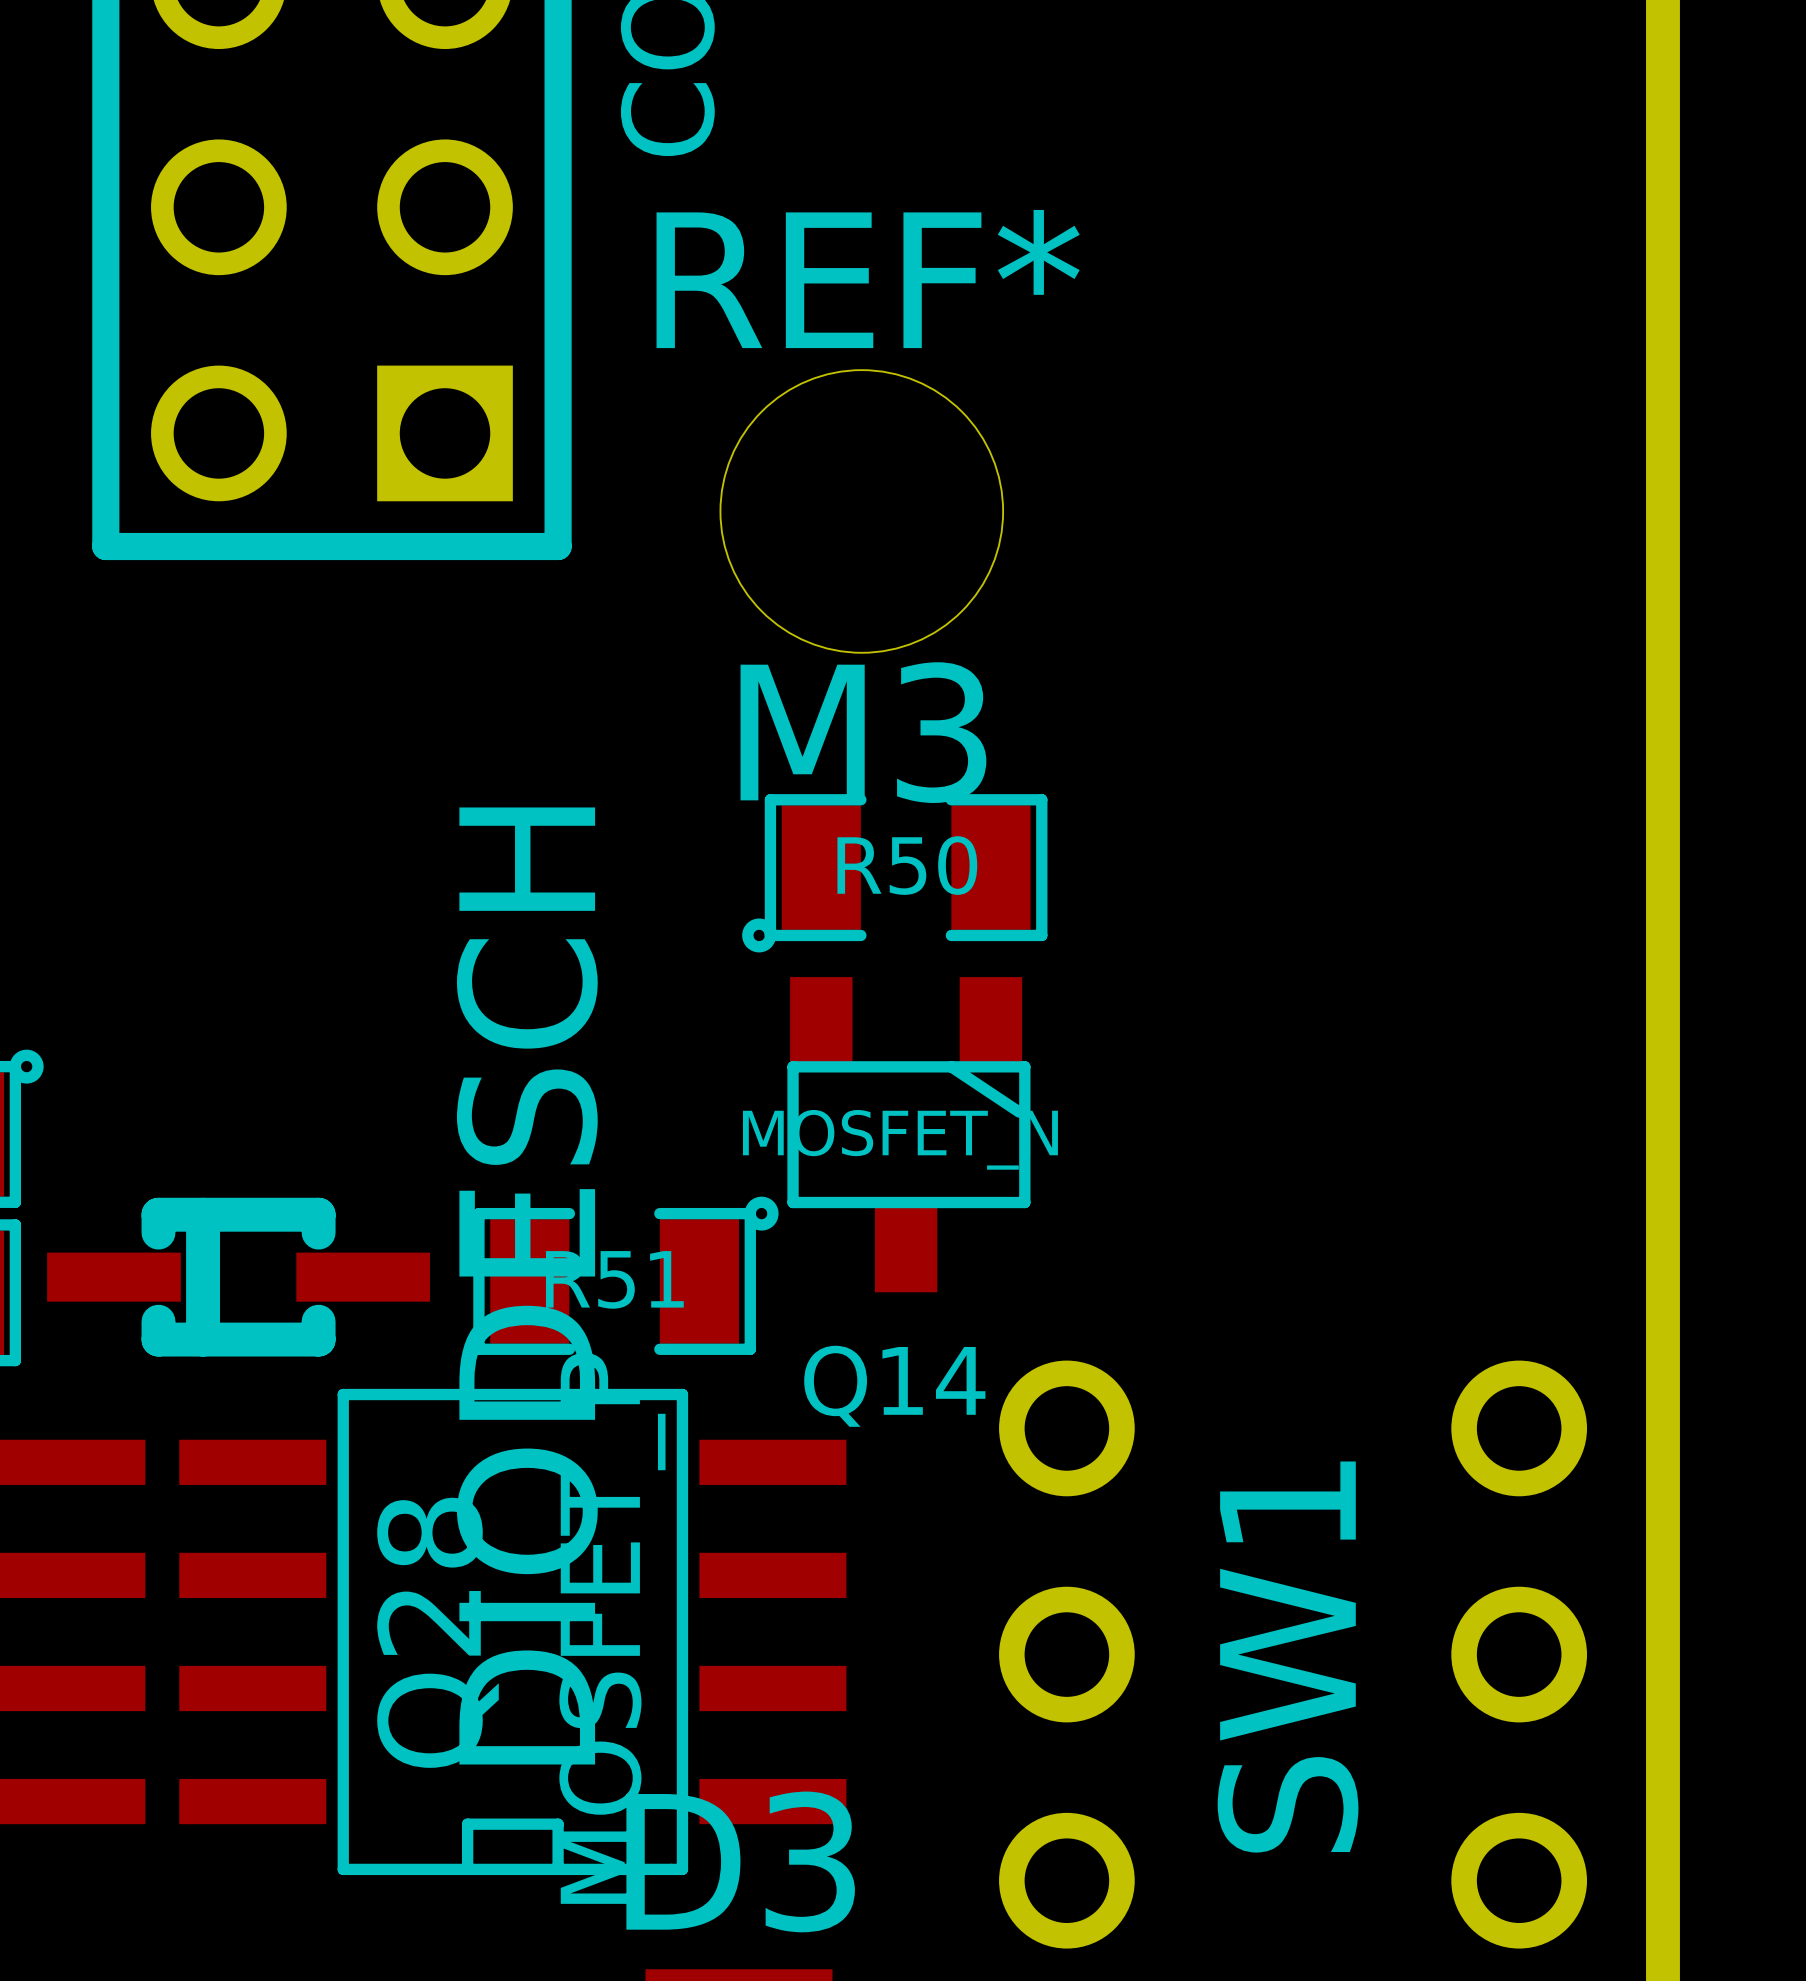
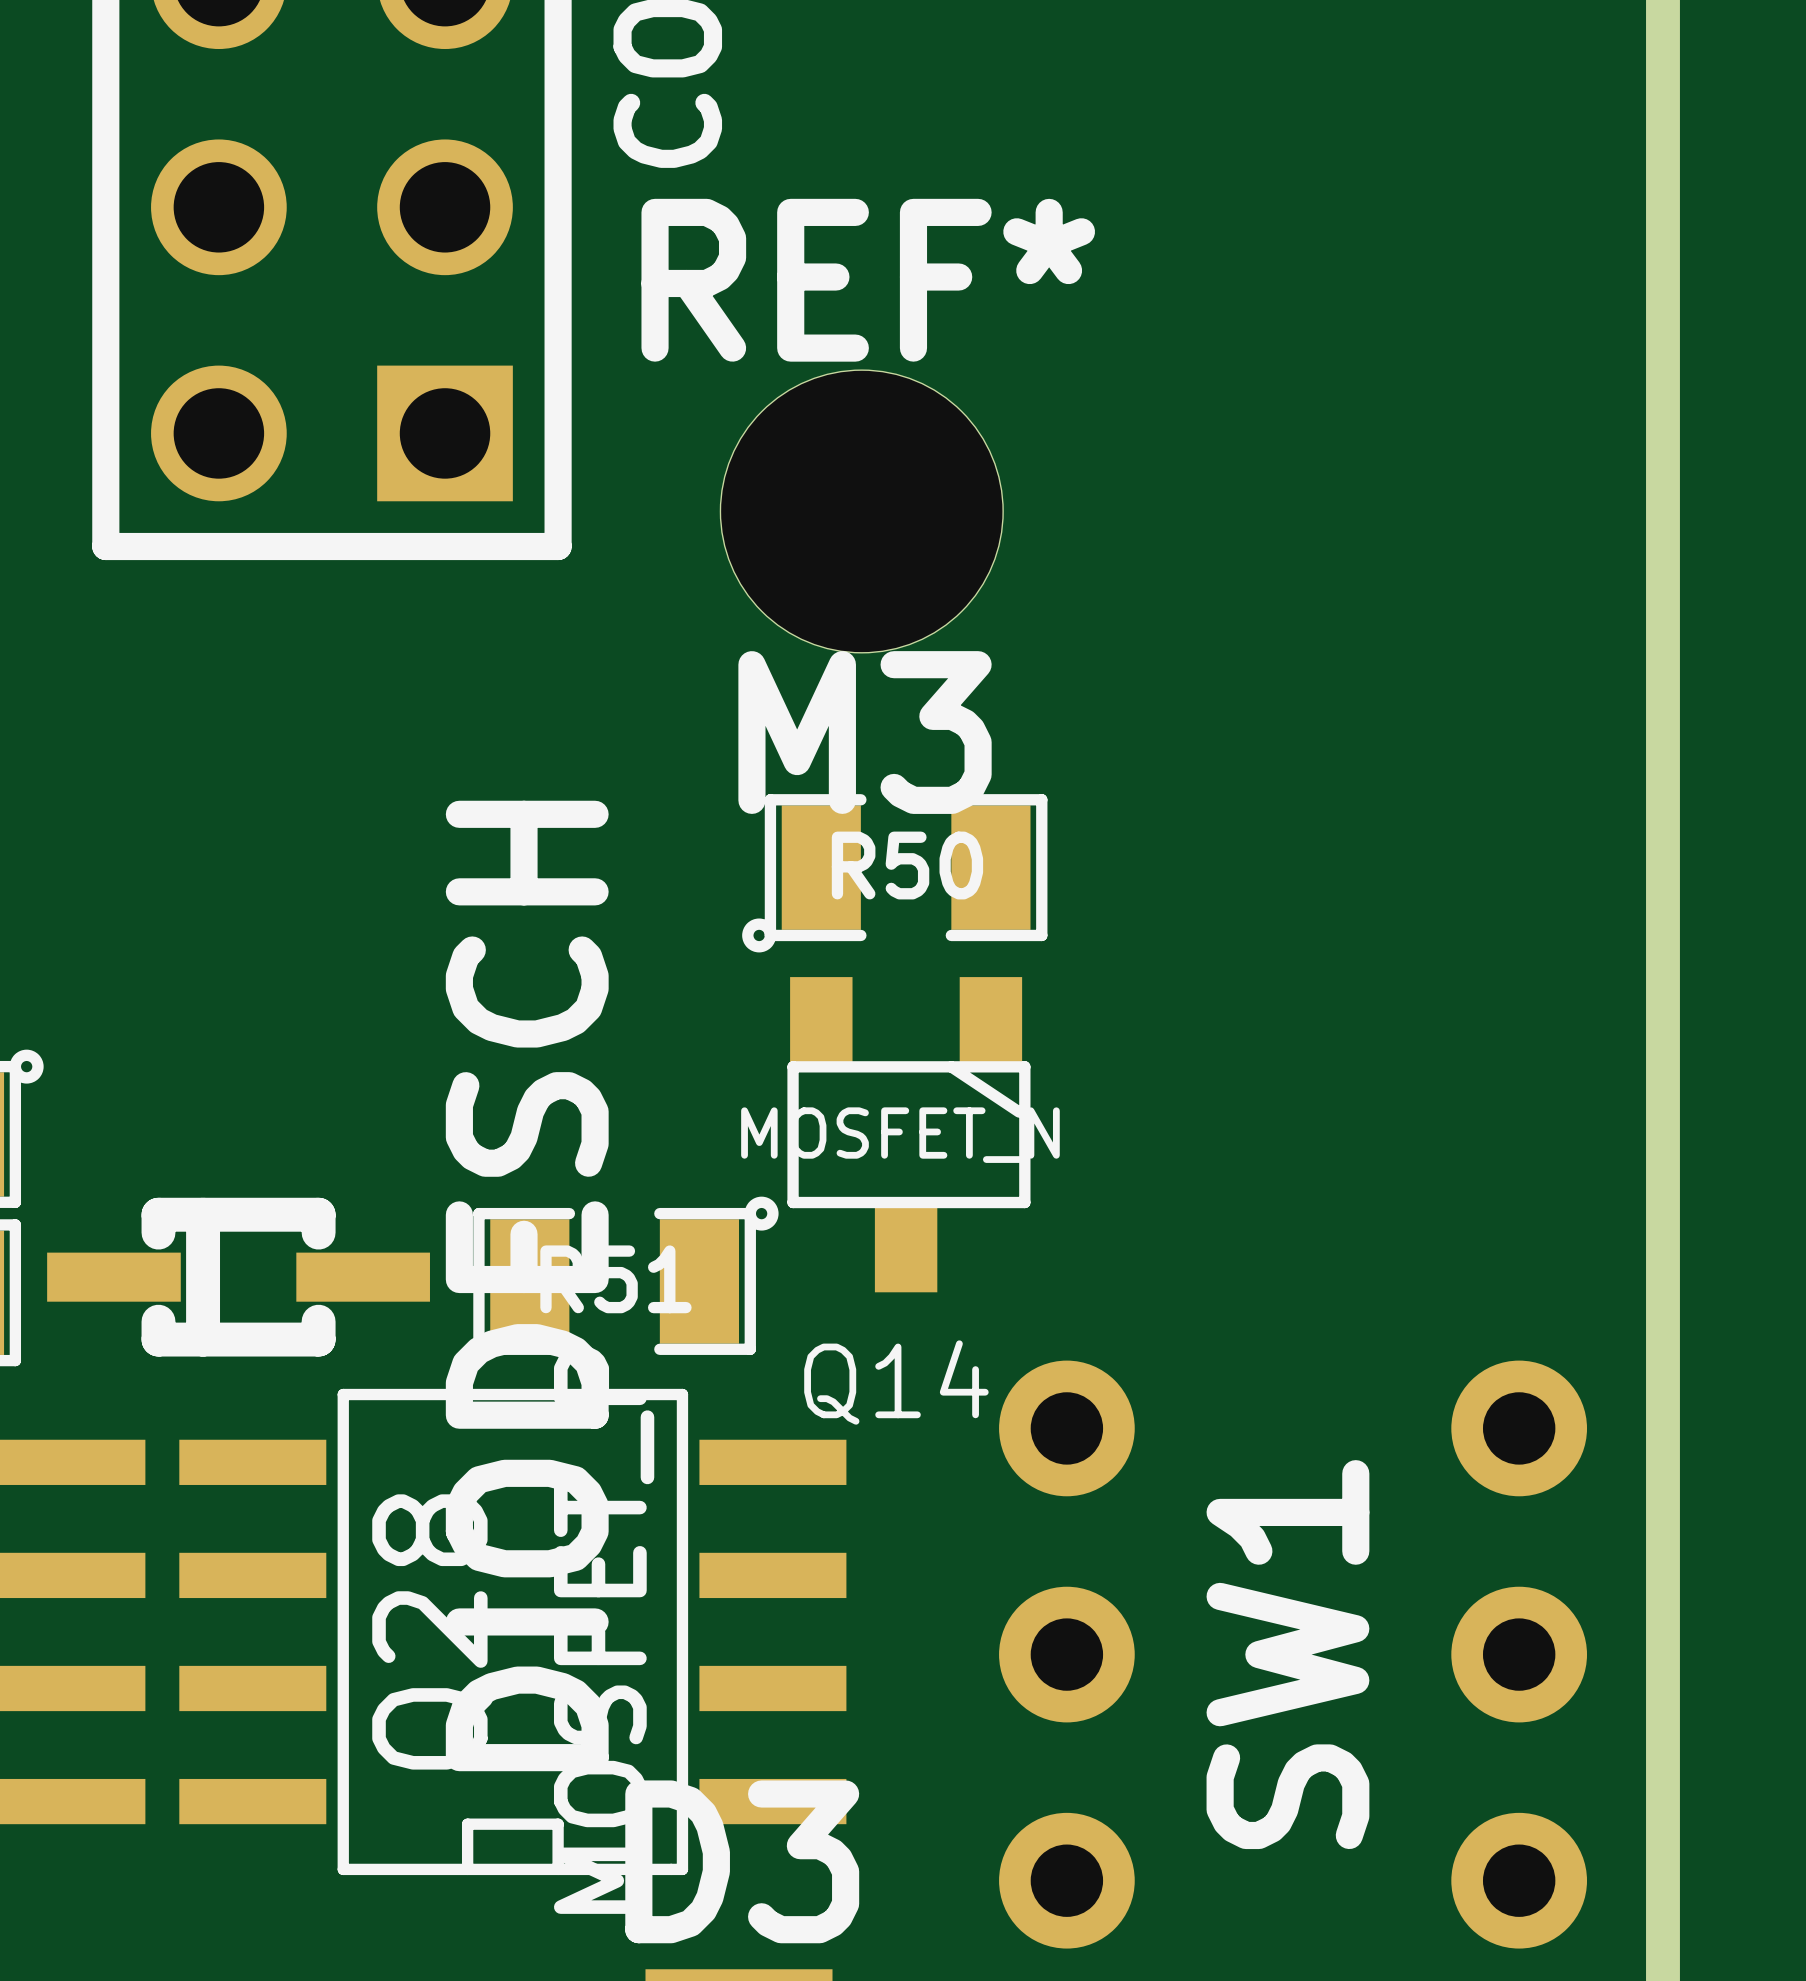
SW1 footprint: [999, 1360, 1588, 1949] -> [999, 1360, 1588, 1949]

